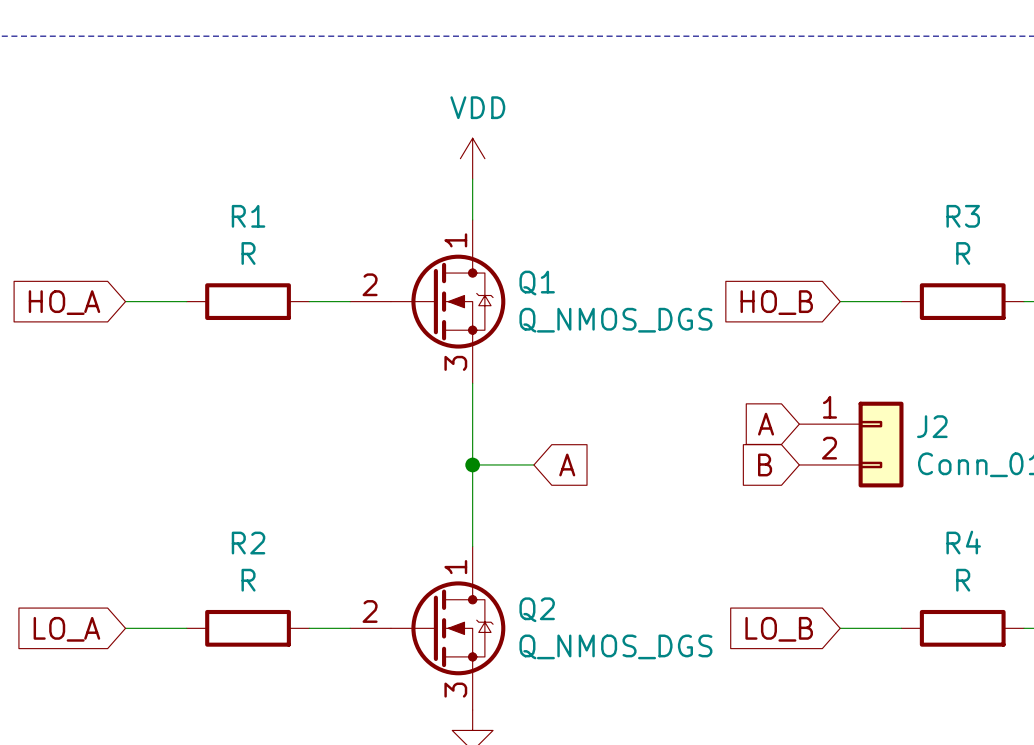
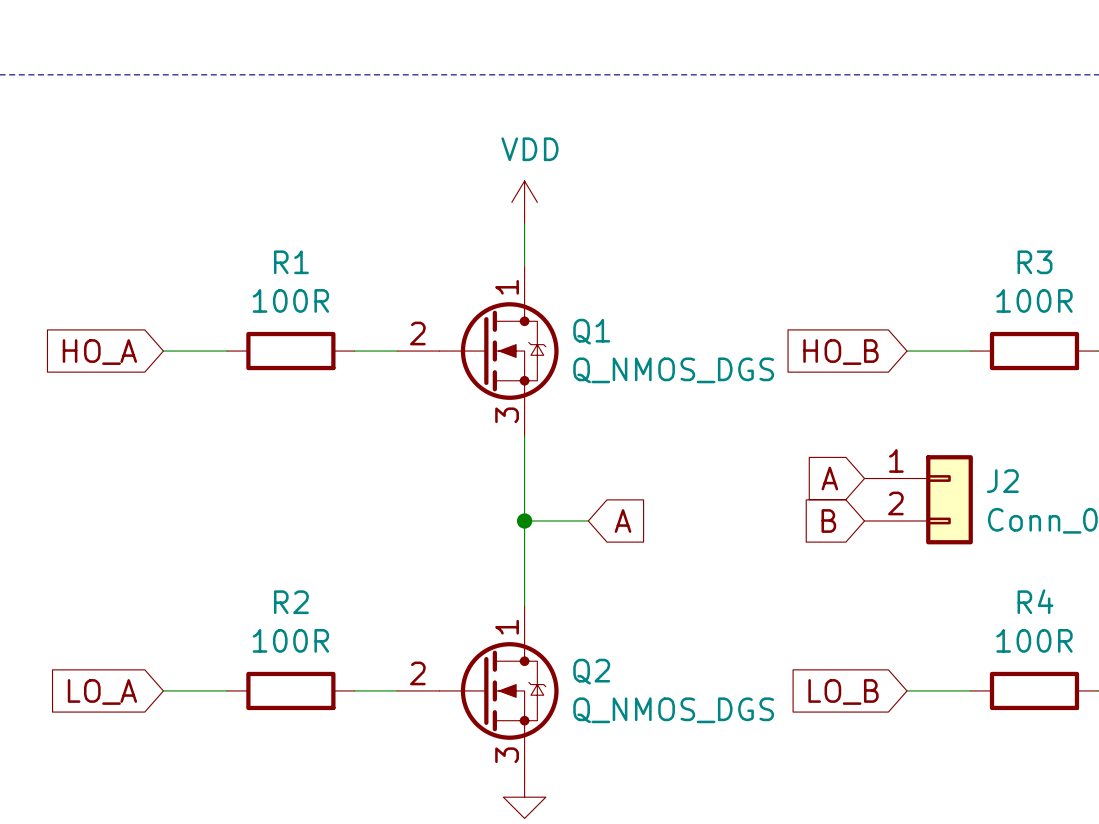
R1 value: R (248, 253) -> 100R (290, 300)
R3 value: R (963, 253) -> 100R (1034, 300)
R2 value: R (248, 580) -> 100R (290, 640)
R4 value: R (963, 580) -> 100R (1034, 640)

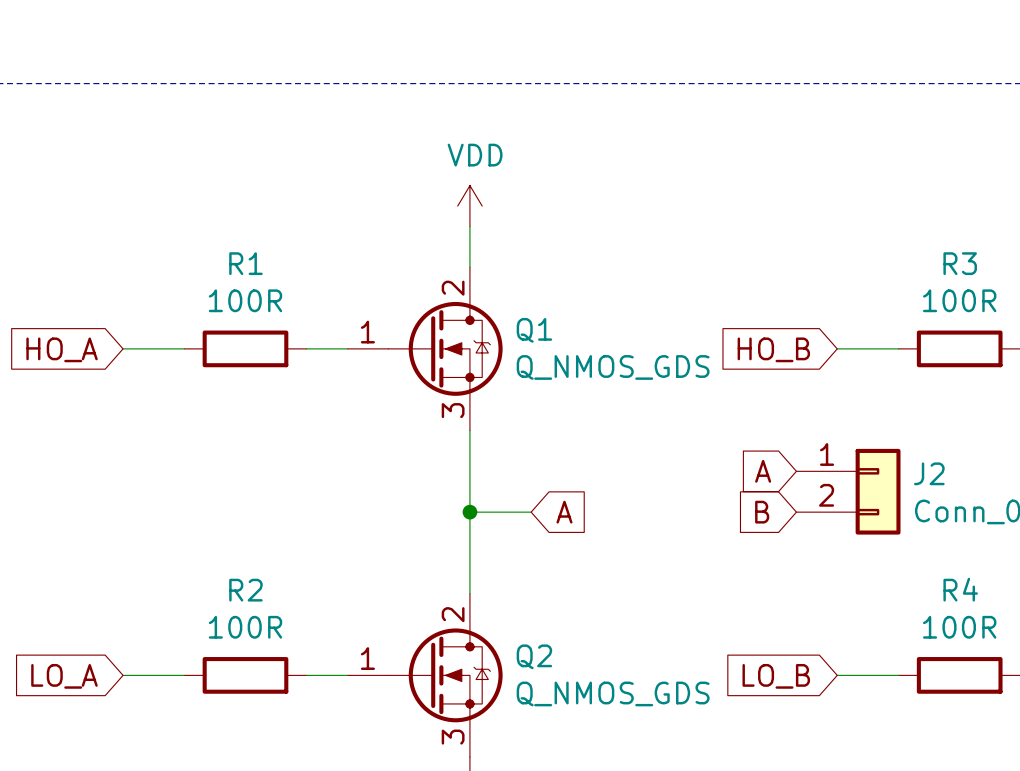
Q1 pin number: 1 (507, 287) -> 2 (453, 288)
Q1 pin number: 2 (417, 333) -> 1 (367, 332)
Q1 value: Q_NMOS_DGS (673, 370) -> Q_NMOS_GDS (613, 367)
Q2 pin number: 1 (507, 627) -> 2 (453, 614)
Q2 pin number: 2 (417, 673) -> 1 (367, 658)
Q2 value: Q_NMOS_DGS (673, 710) -> Q_NMOS_GDS (613, 693)

